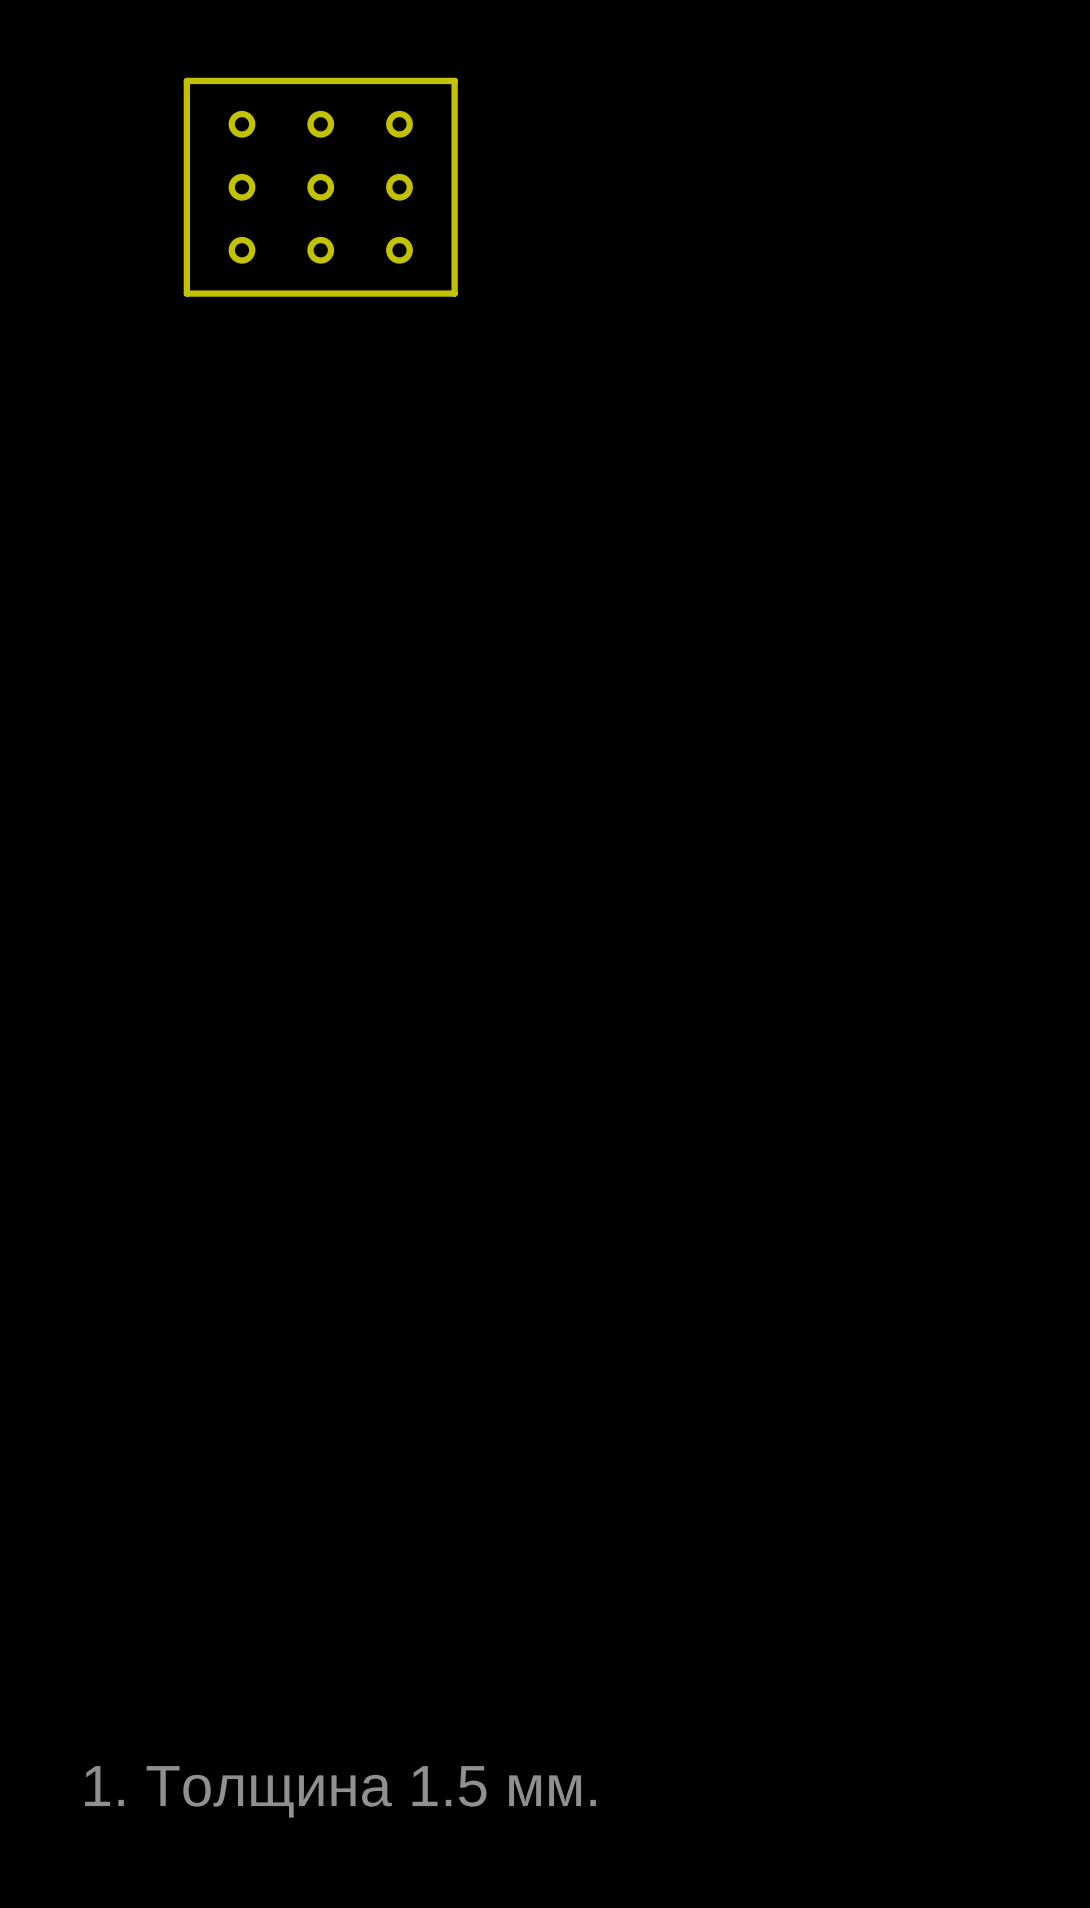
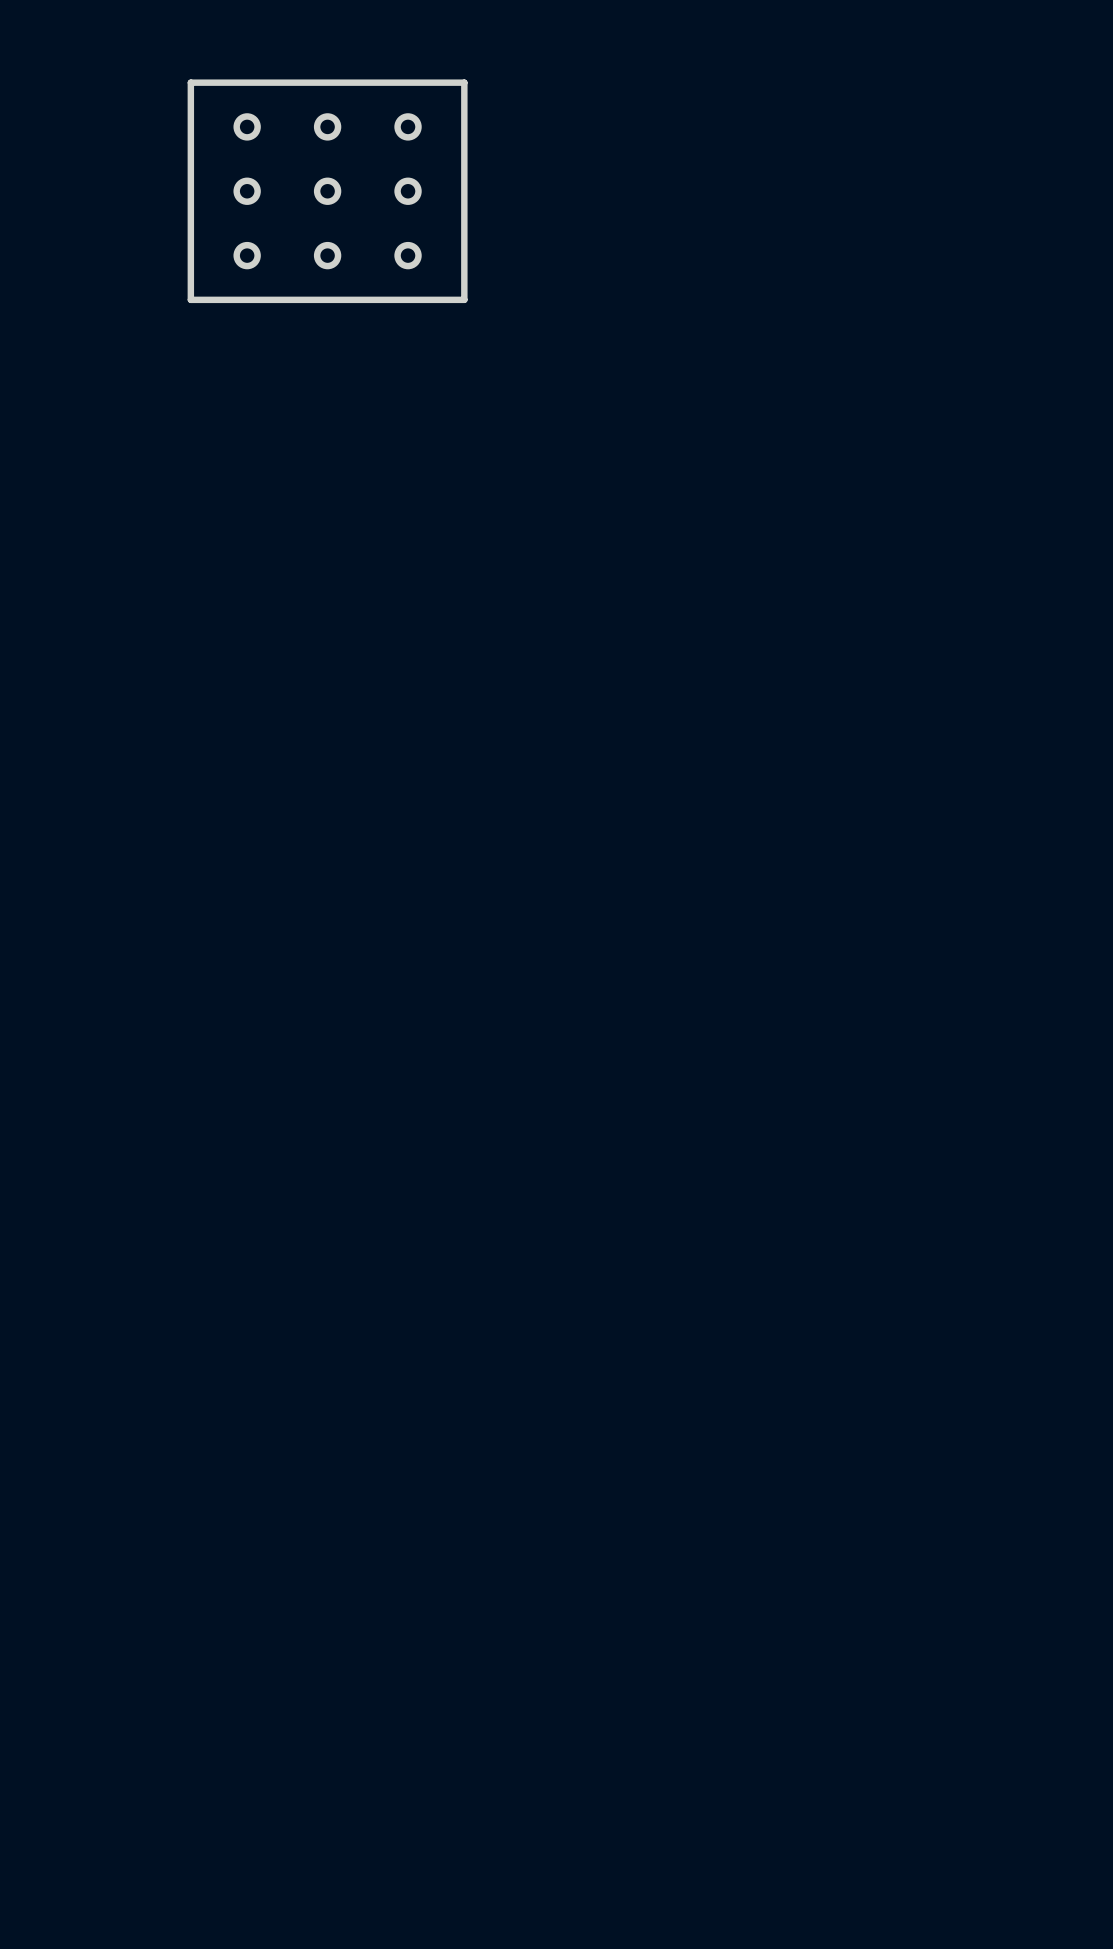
text: 1. Толщина 1.5 мм. (340, 1791) -> none

